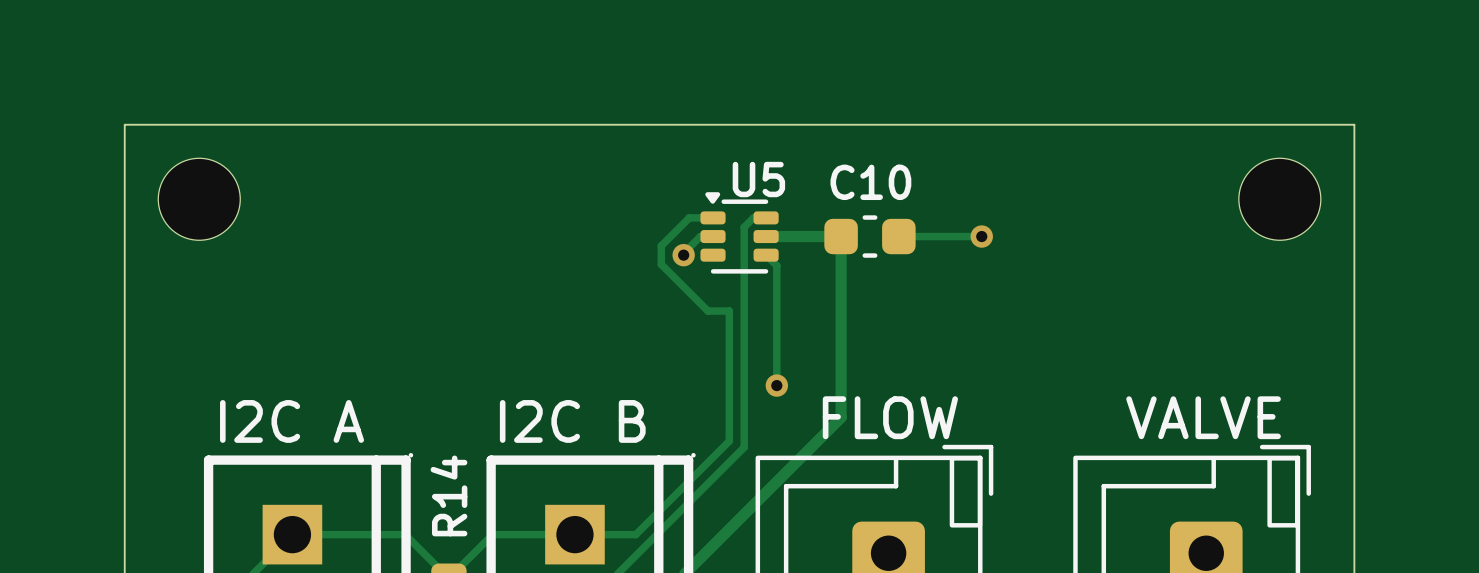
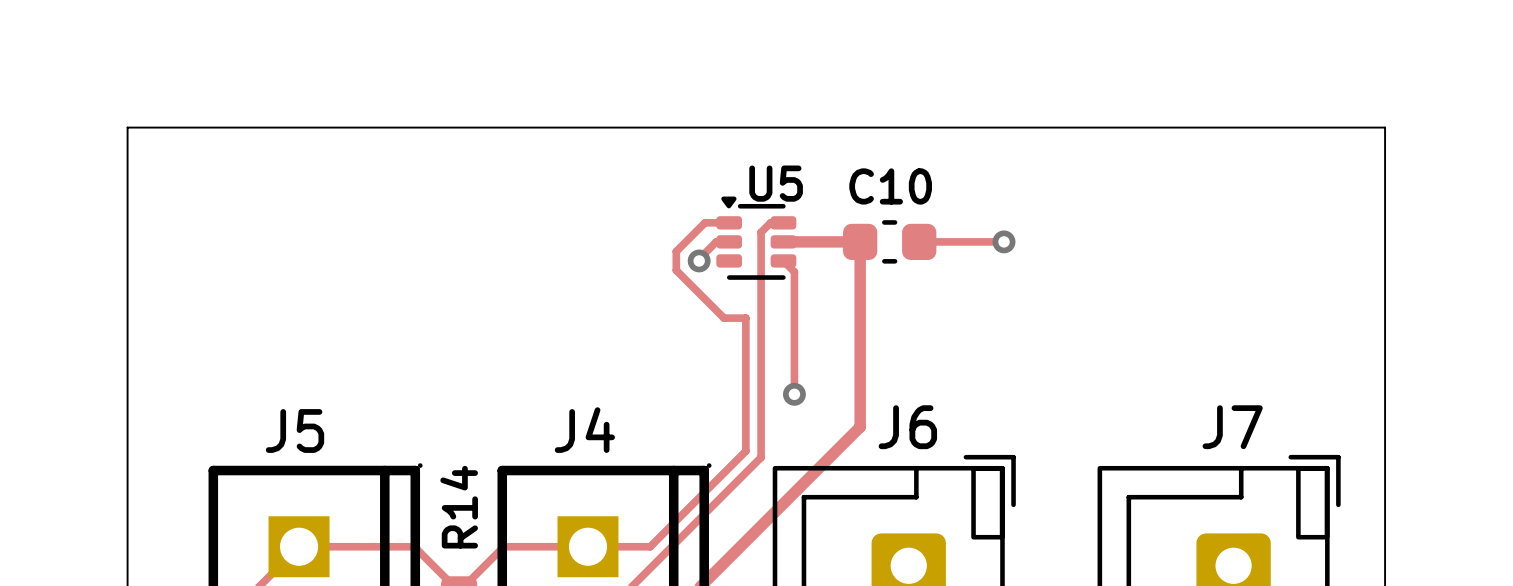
part: (199, 199) -> none
part: (1279, 199) -> none
FLOW name: FLOW (890, 417) -> J6 (907, 427)
VALVE name: VALVE (1203, 417) -> J7 (1232, 427)
I2C A name: I2C A (292, 421) -> J5 (295, 431)
I2C B name: I2C B (572, 421) -> J4 (584, 430)

